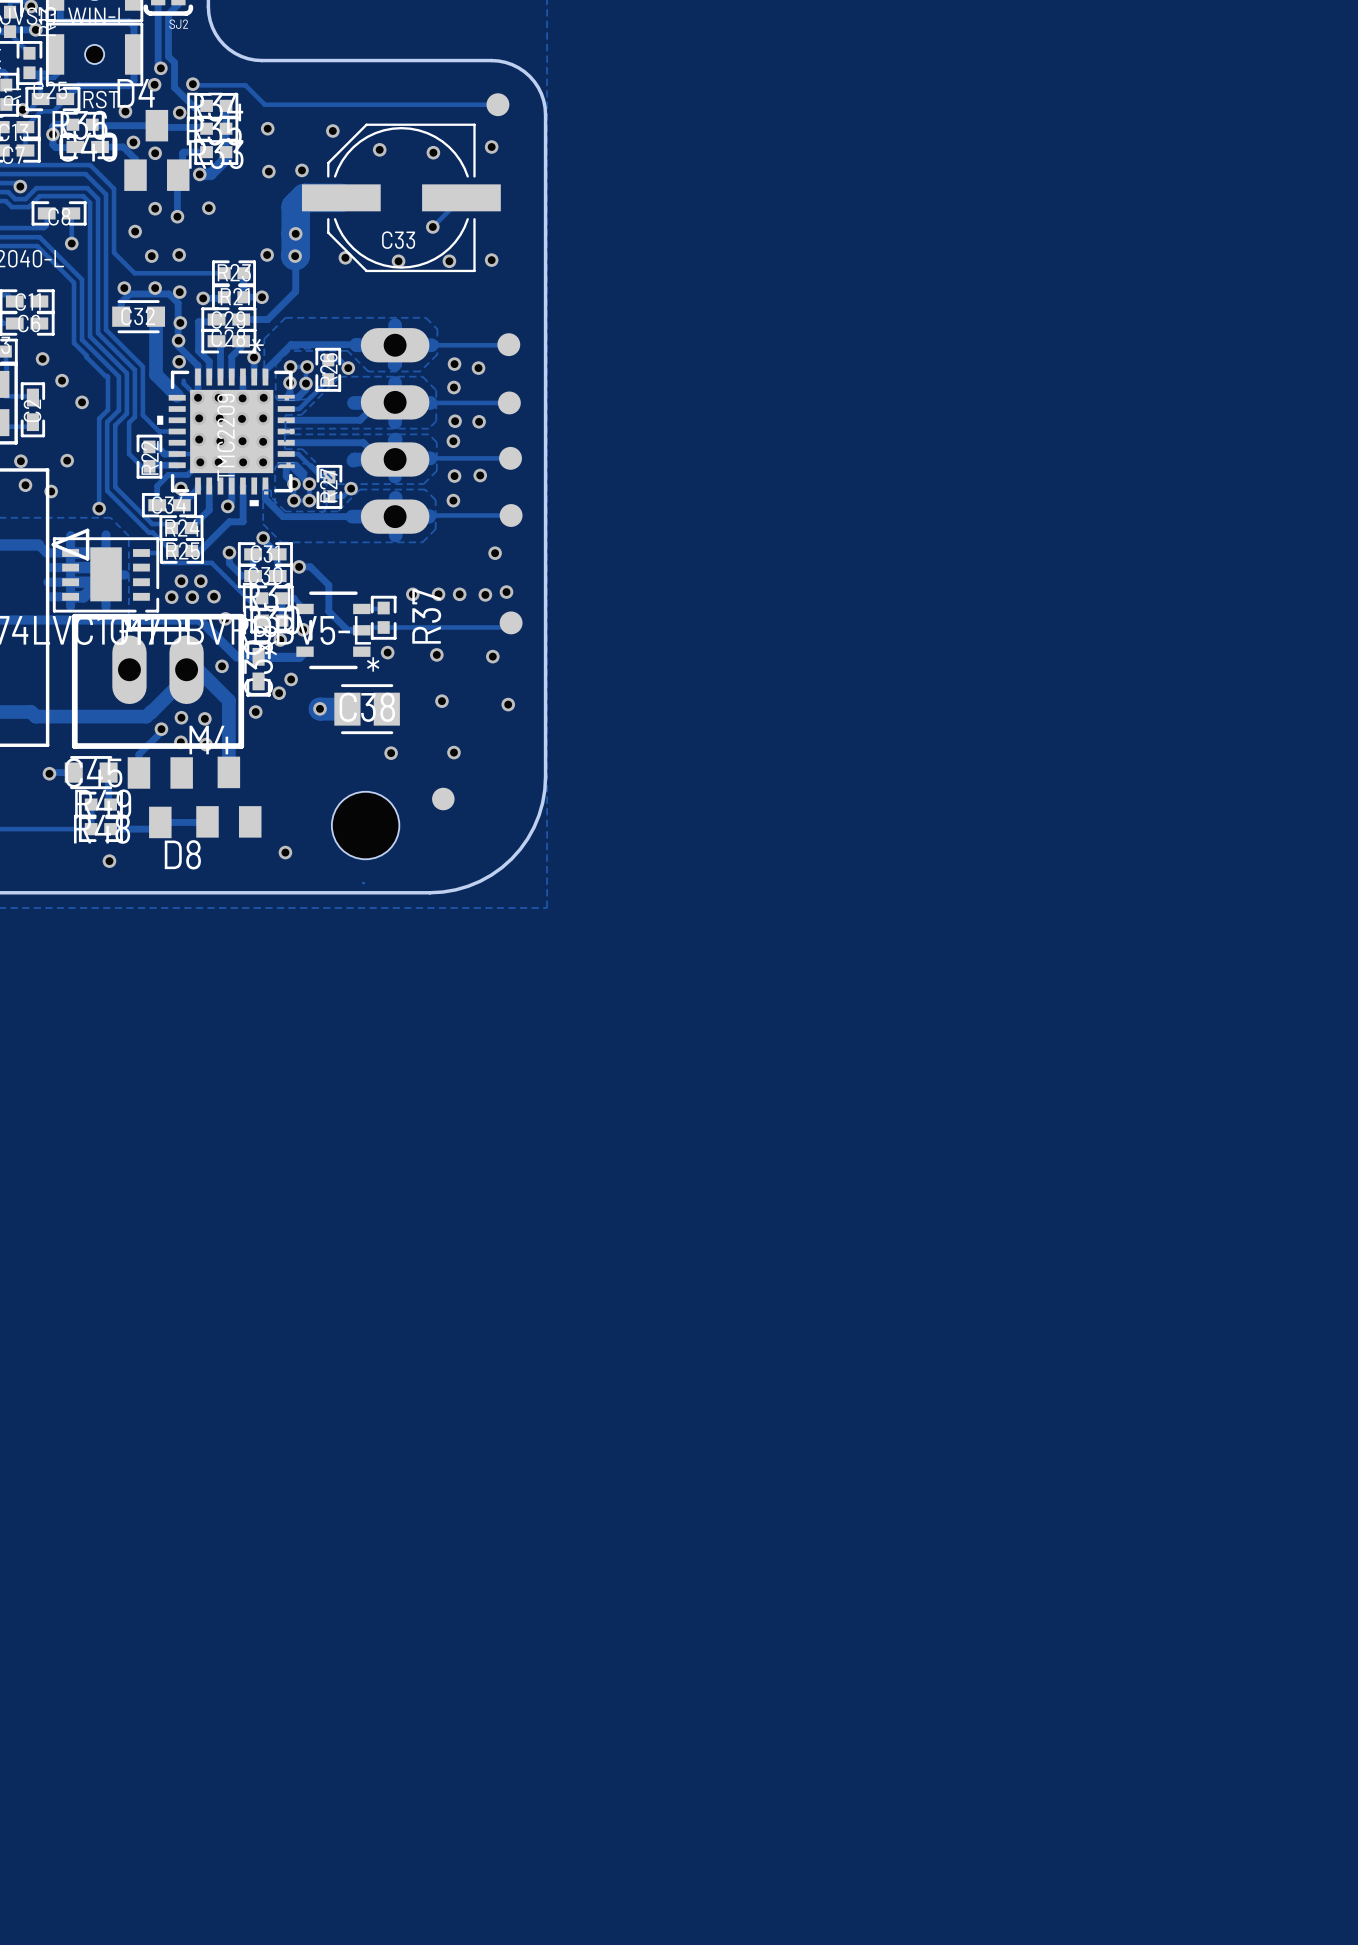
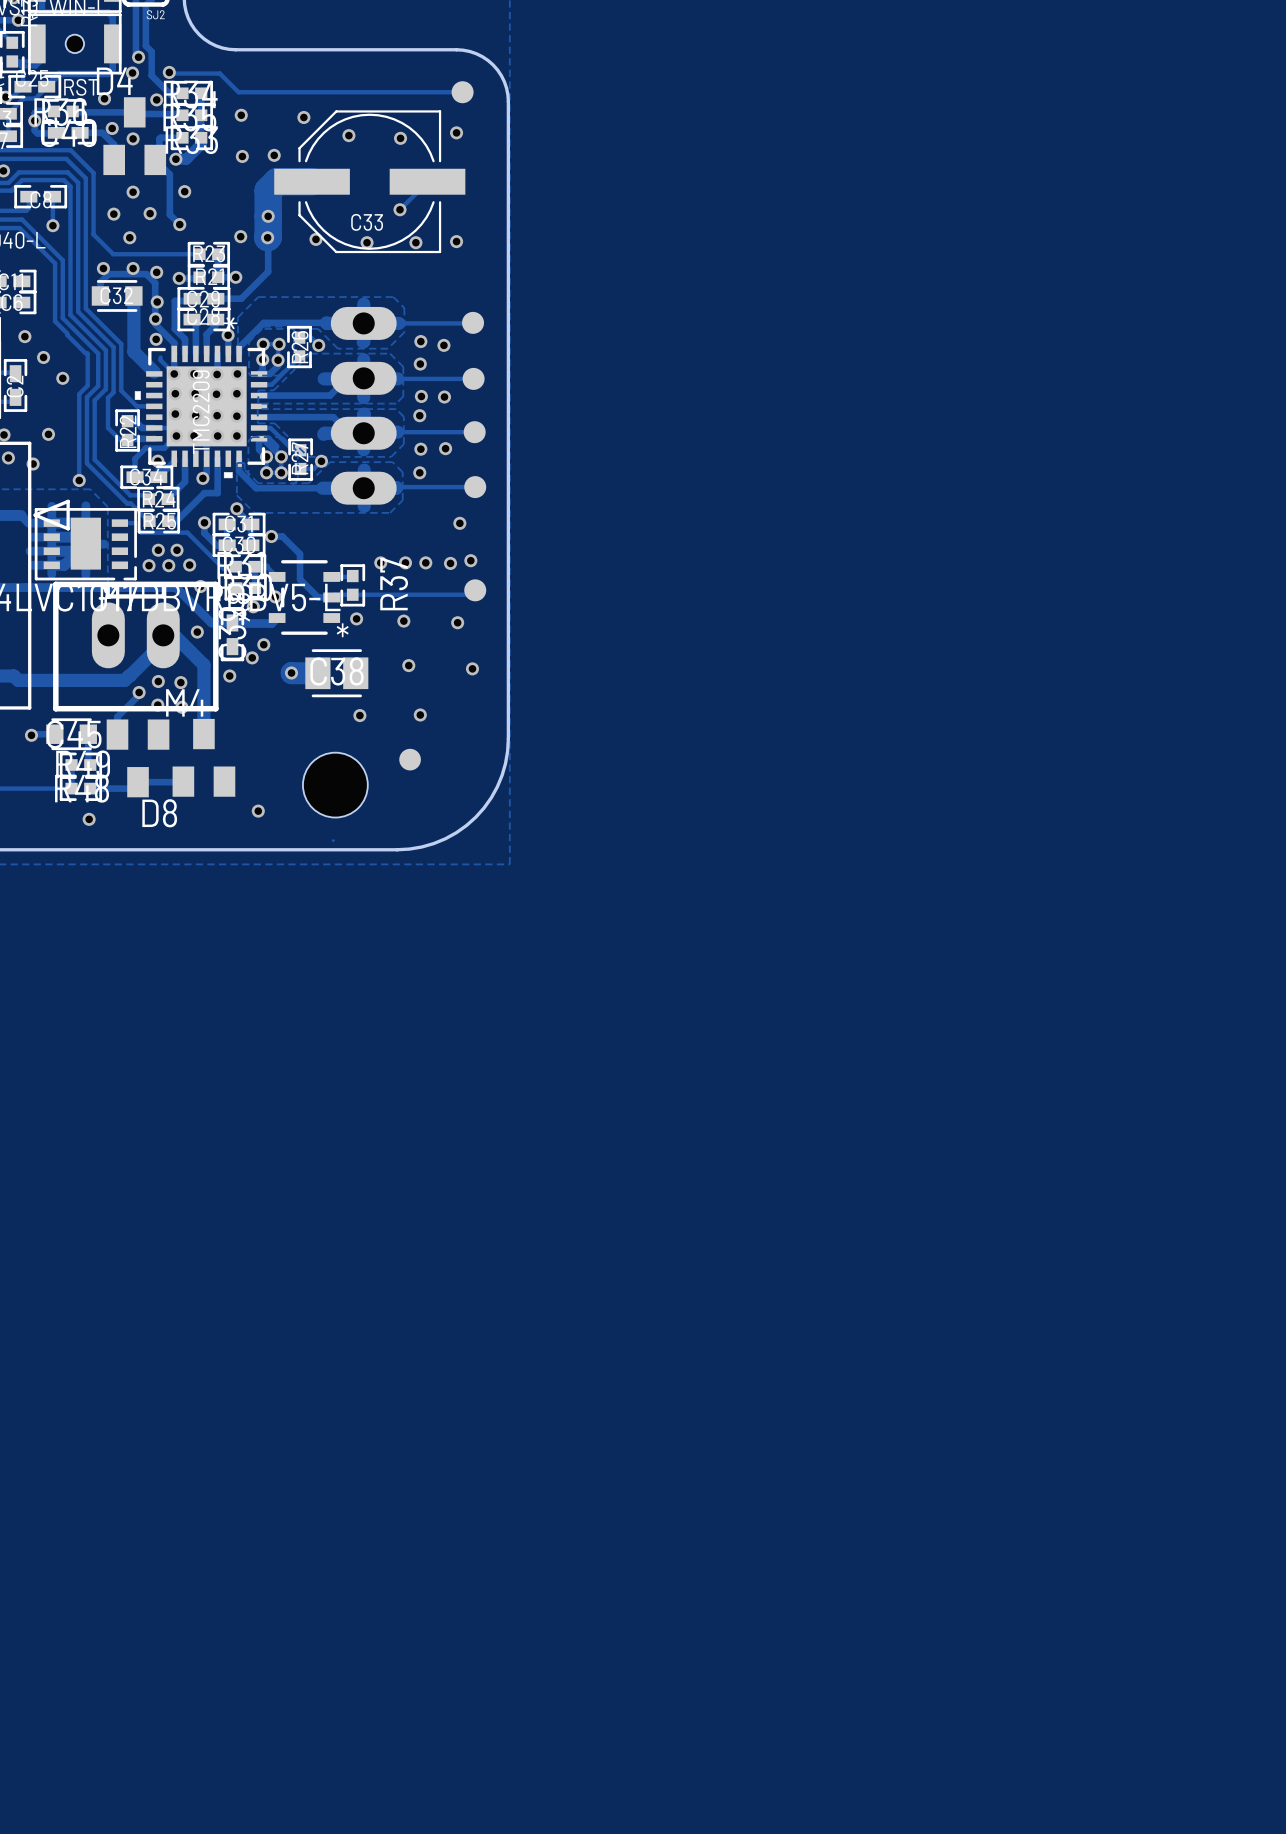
track: (178, 175) (177, 216) -> (155, 159) (169, 174) (169, 214) (179, 224)
via: (177, 216) -> none
via: none -> (150, 213)
via: none -> (179, 224)
via: (179, 254) -> none

